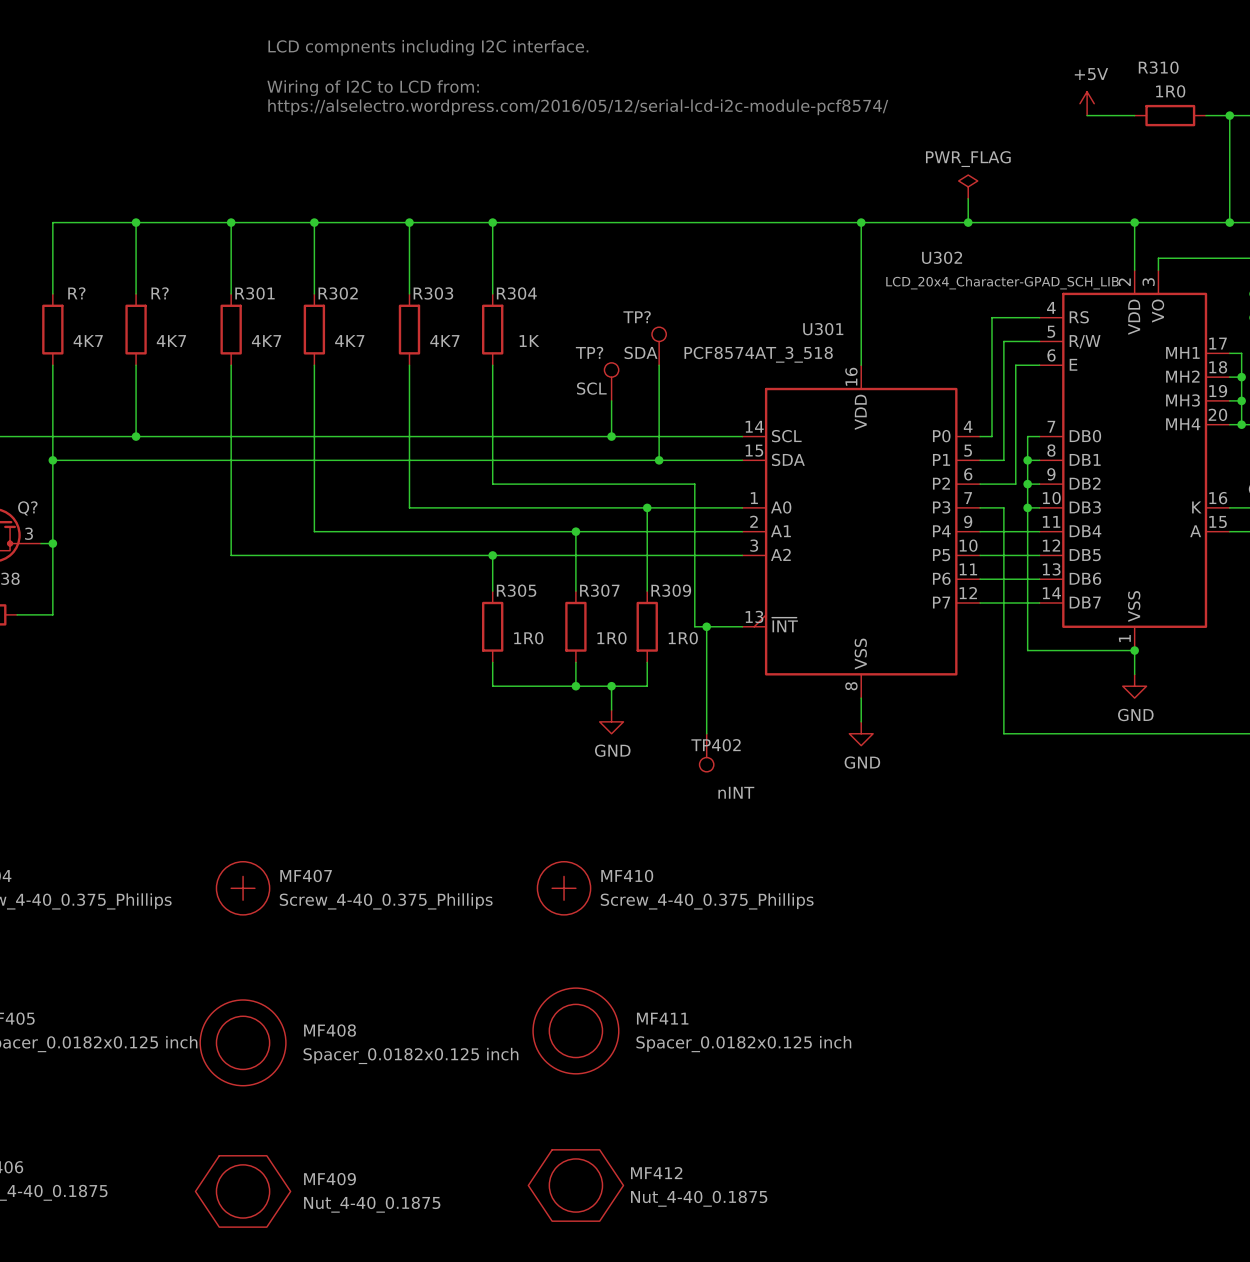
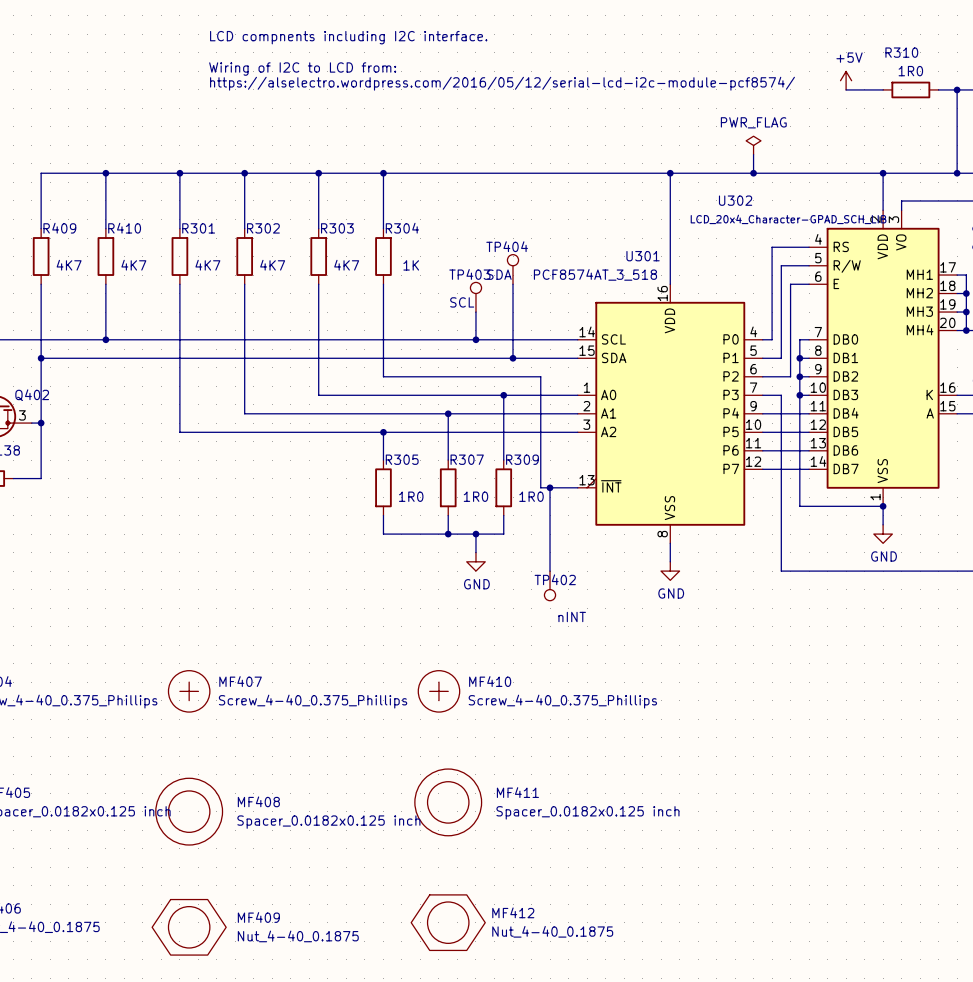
R? name: R? (76, 293) -> R409 (59, 228)
R? name: R? (160, 293) -> R410 (124, 228)
TP? name: TP? (637, 317) -> TP404 (507, 246)
TP? name: TP? (589, 352) -> TP403 (469, 274)
Q? name: Q? (27, 508) -> Q402 (32, 395)

